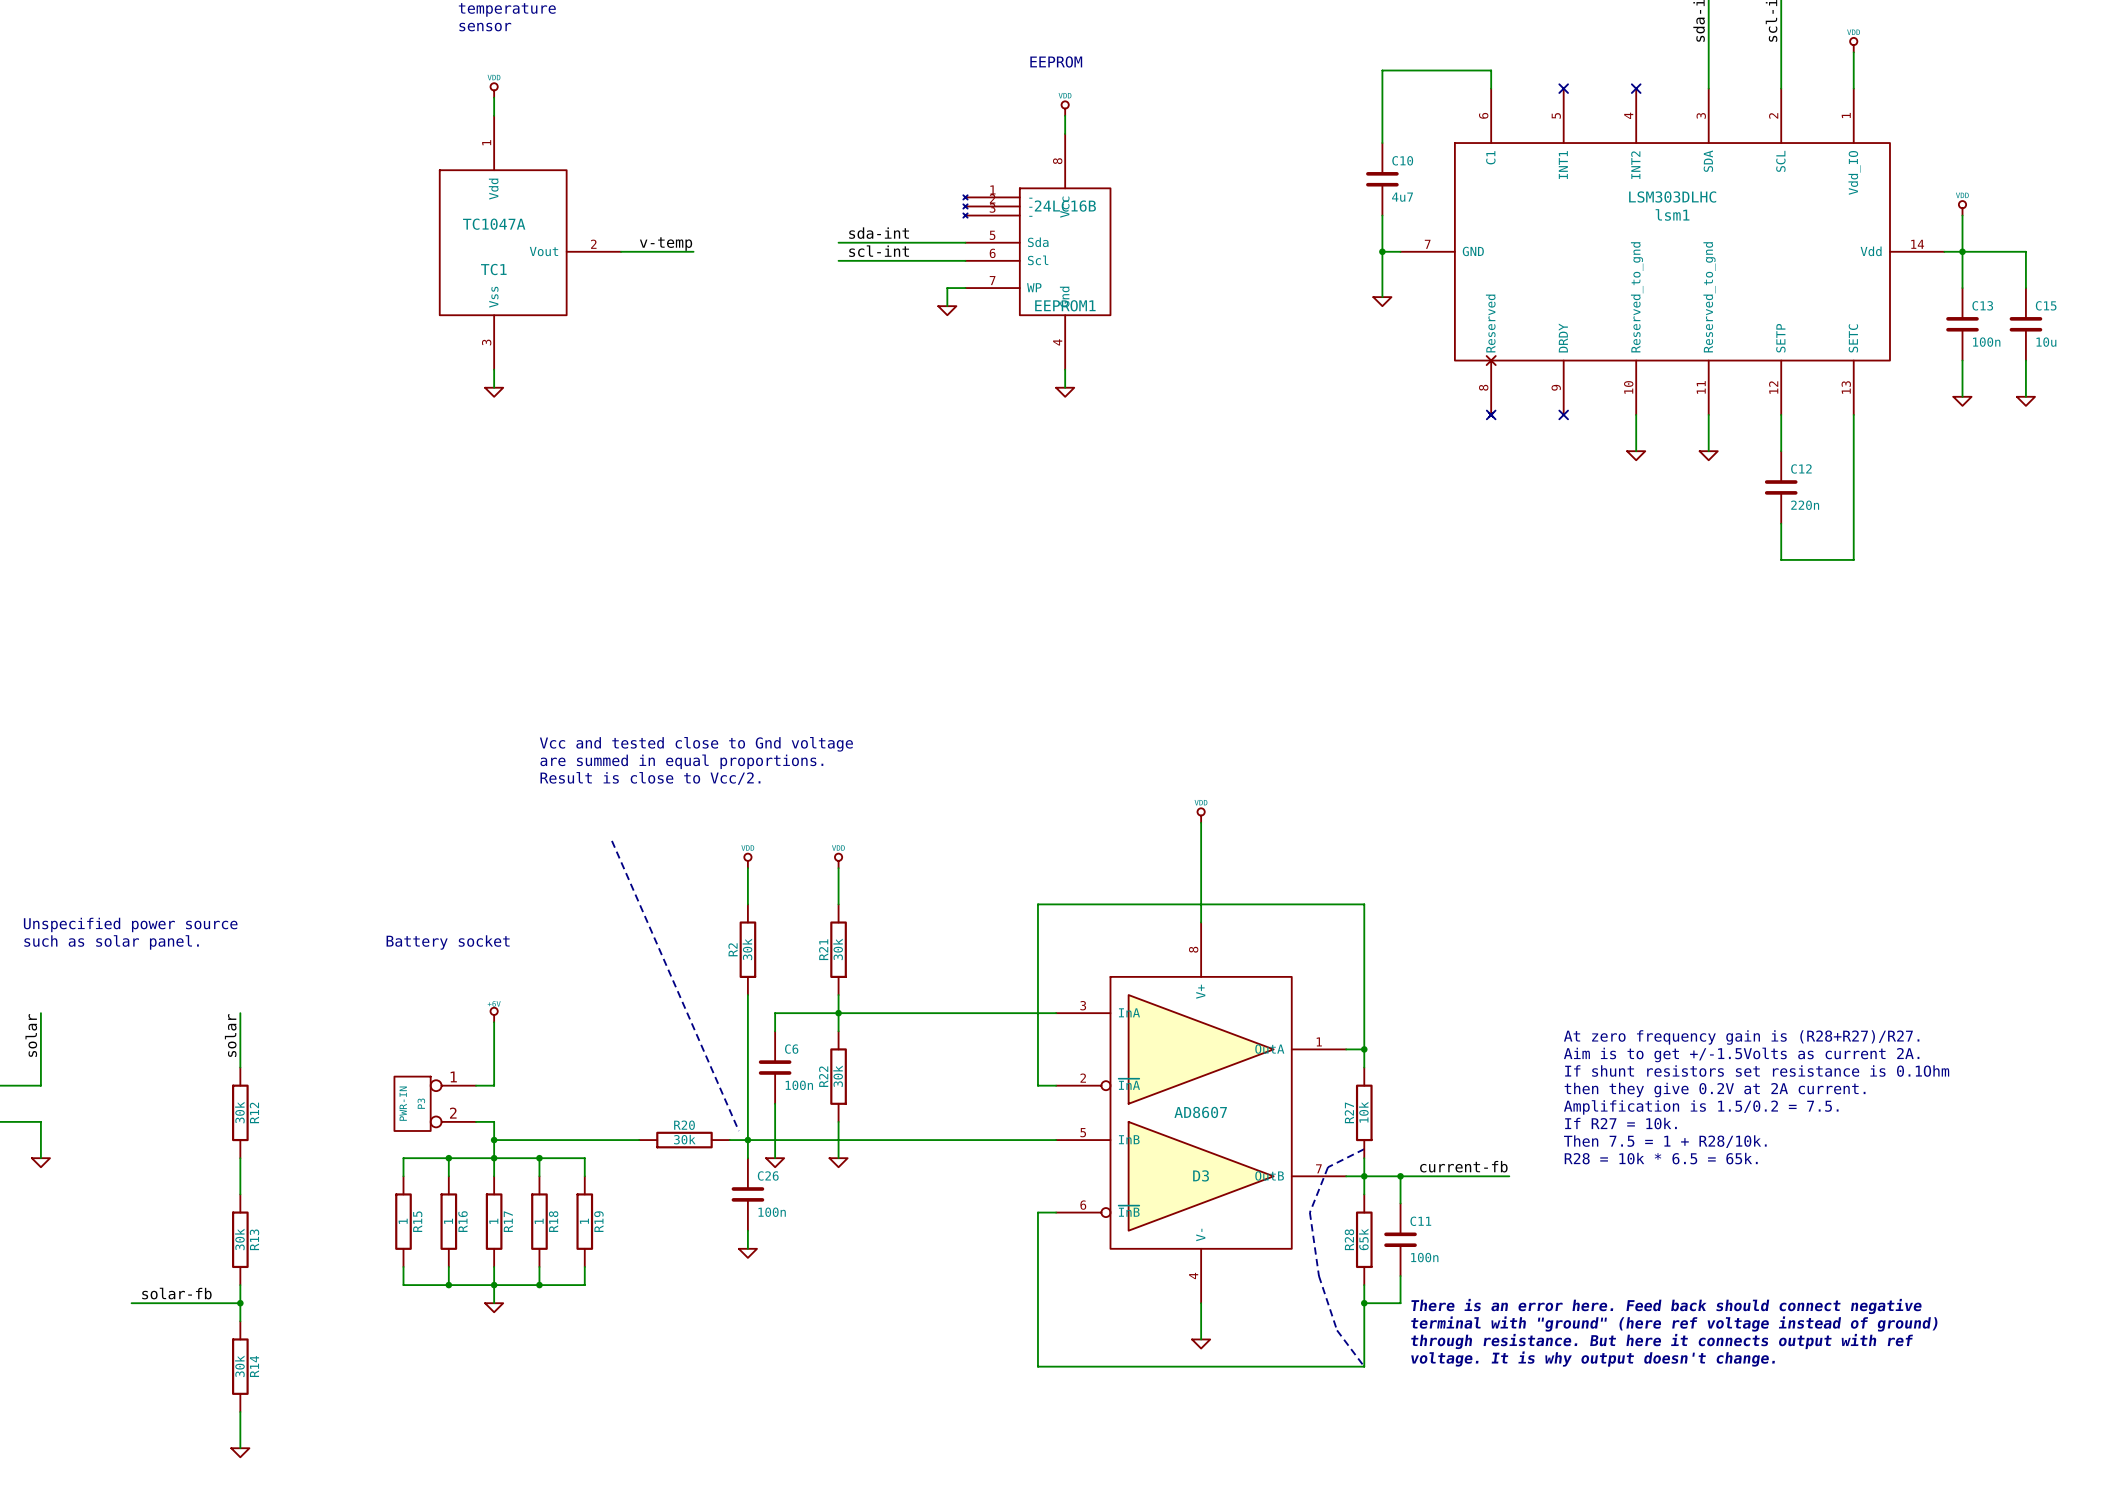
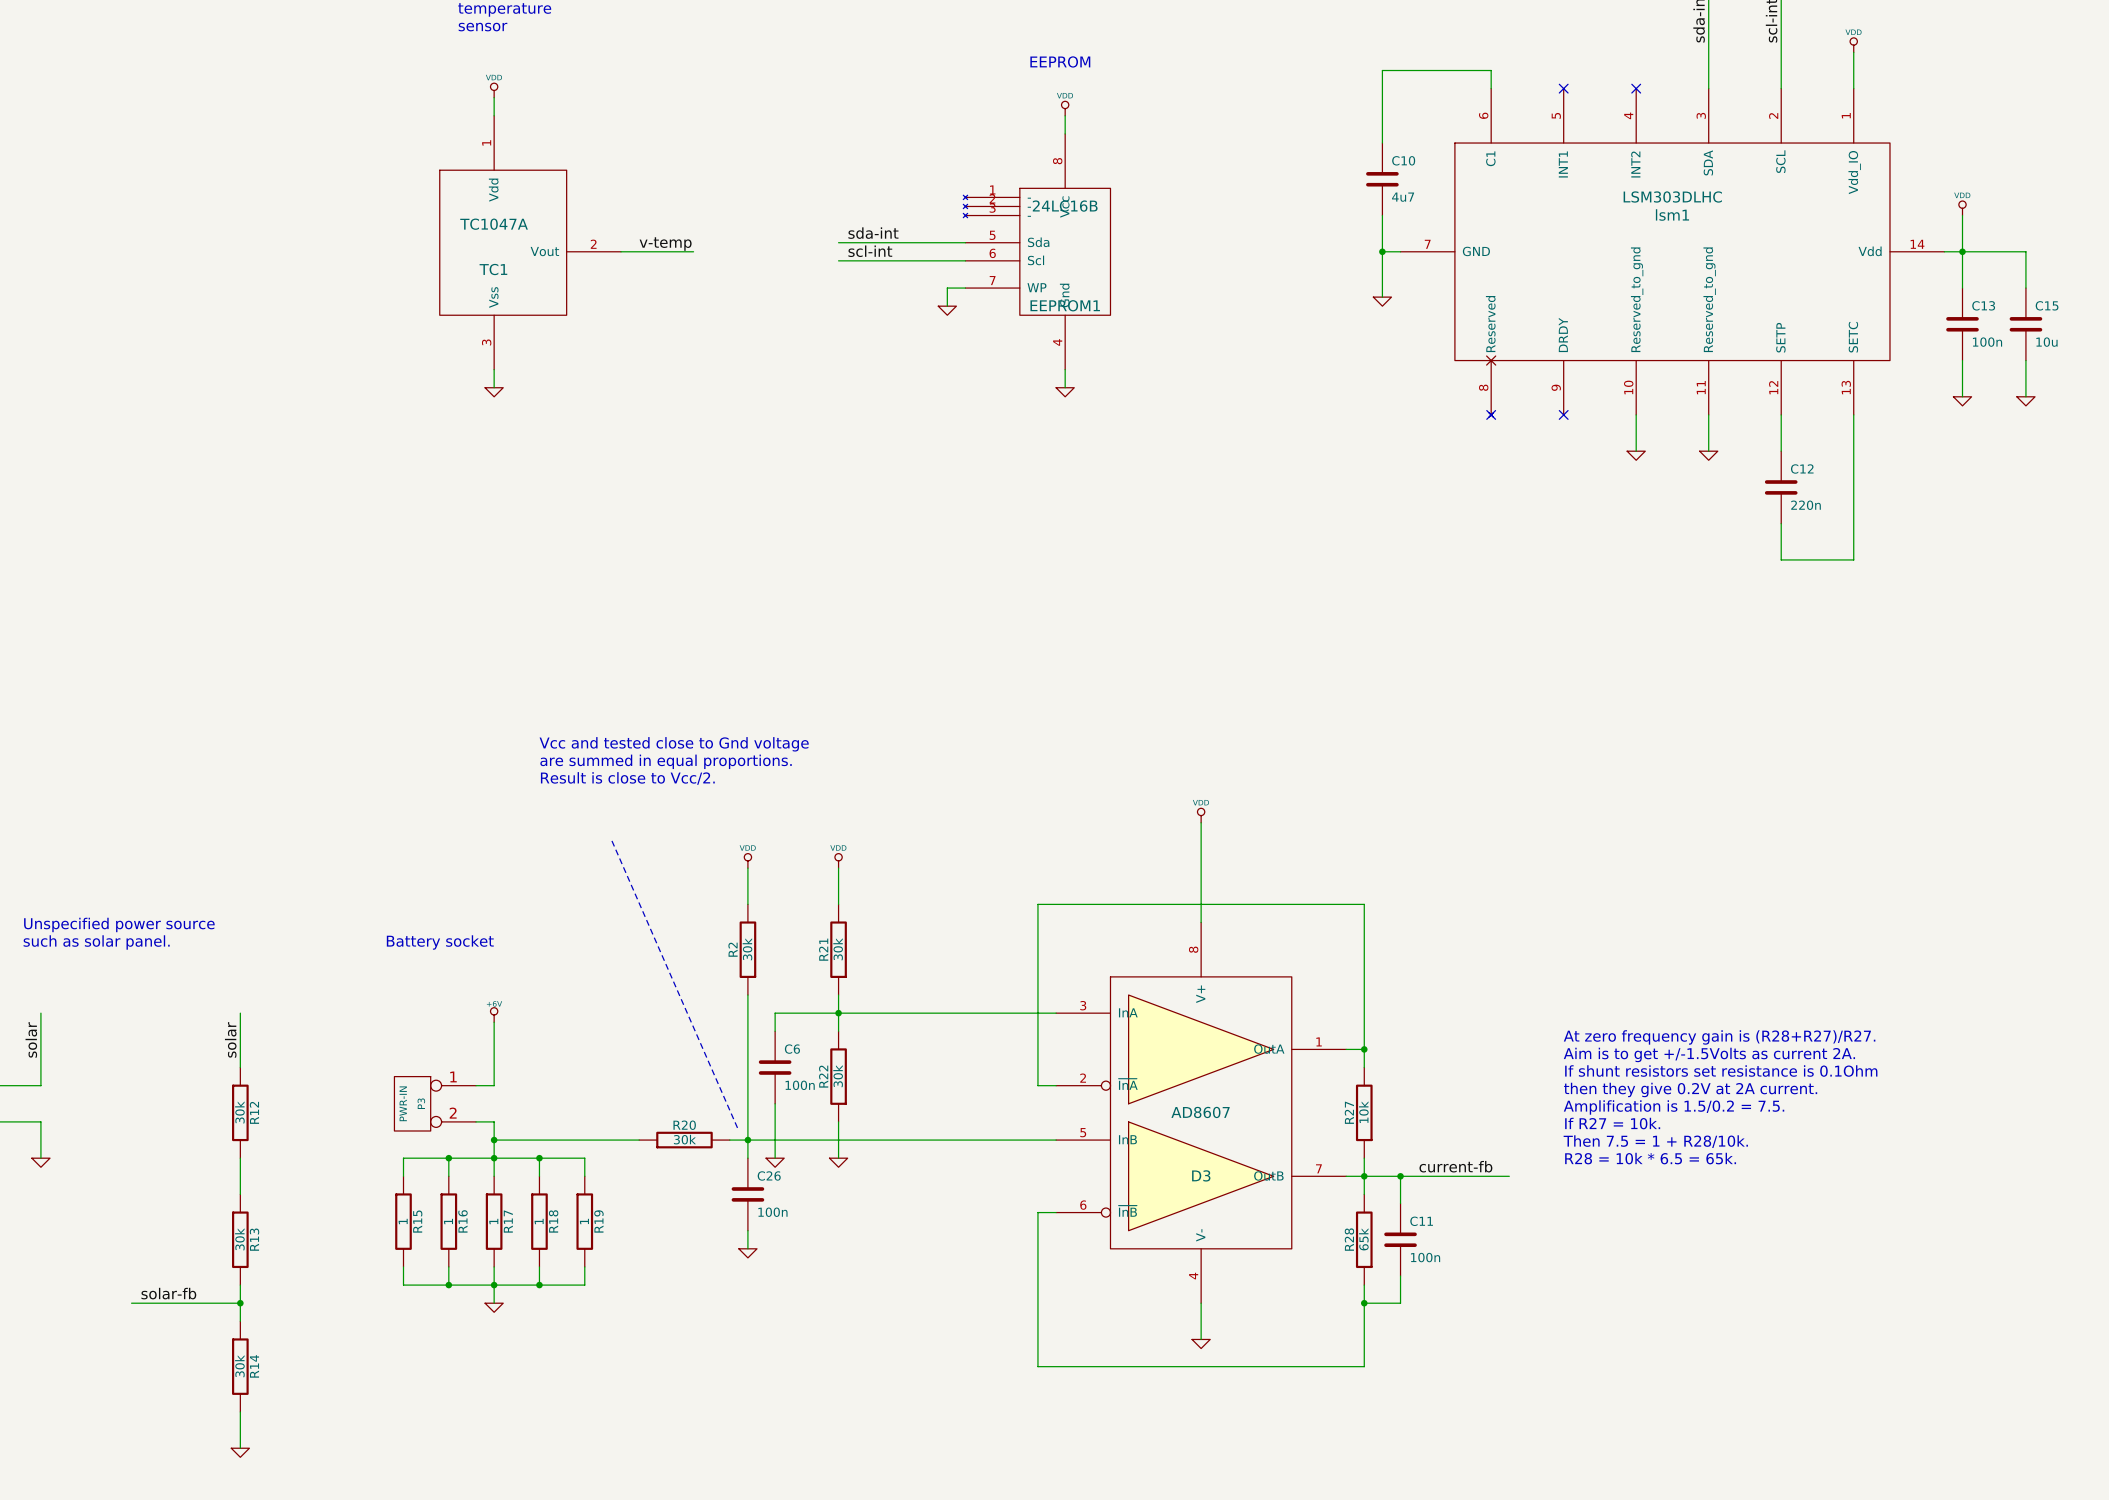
line: (1364, 1149) (1328, 1167) (1309, 1212) (1318, 1276) (1337, 1330) (1364, 1366) -> none
text: There is an error here. Feed back should connect negative (1666, 1306) -> none
text: terminal with "ground" (here ref voltage instead of ground) (1674, 1323) -> none
text: through resistance. But here it connects output with ref (1662, 1341) -> none
text: voltage. It is why output doesn't change. (1593, 1359) -> none

